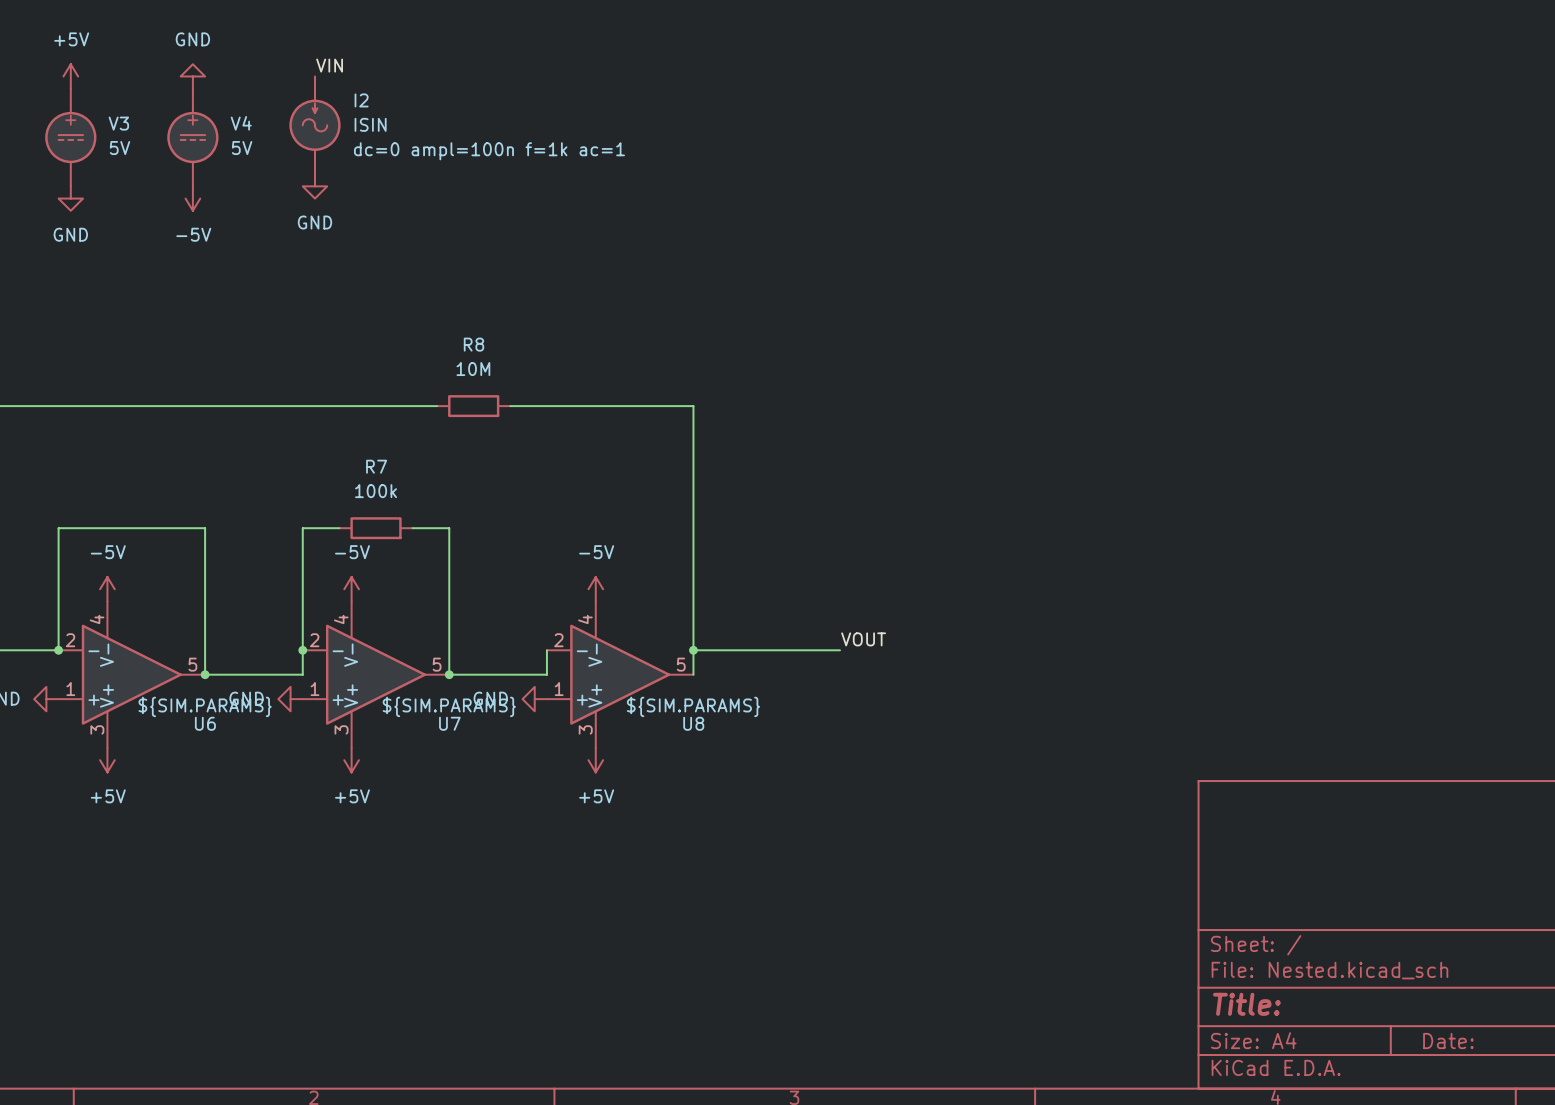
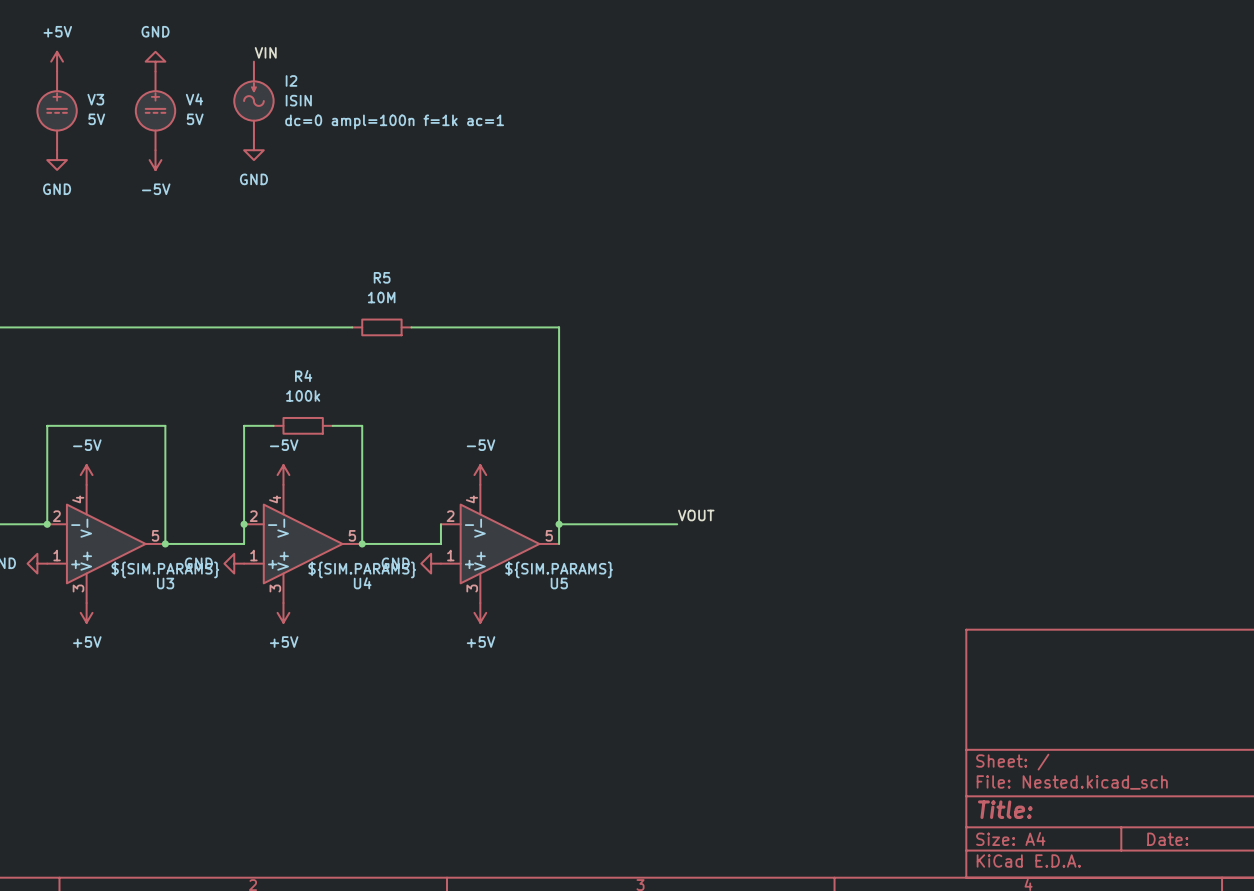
R8 name: R8 (473, 344) -> R5 (382, 277)
R7 name: R7 (376, 466) -> R4 (303, 376)
U6 name: U6 (205, 723) -> U3 (165, 583)
U7 name: U7 (449, 723) -> U4 (362, 583)
U8 name: U8 (693, 723) -> U5 (559, 583)

